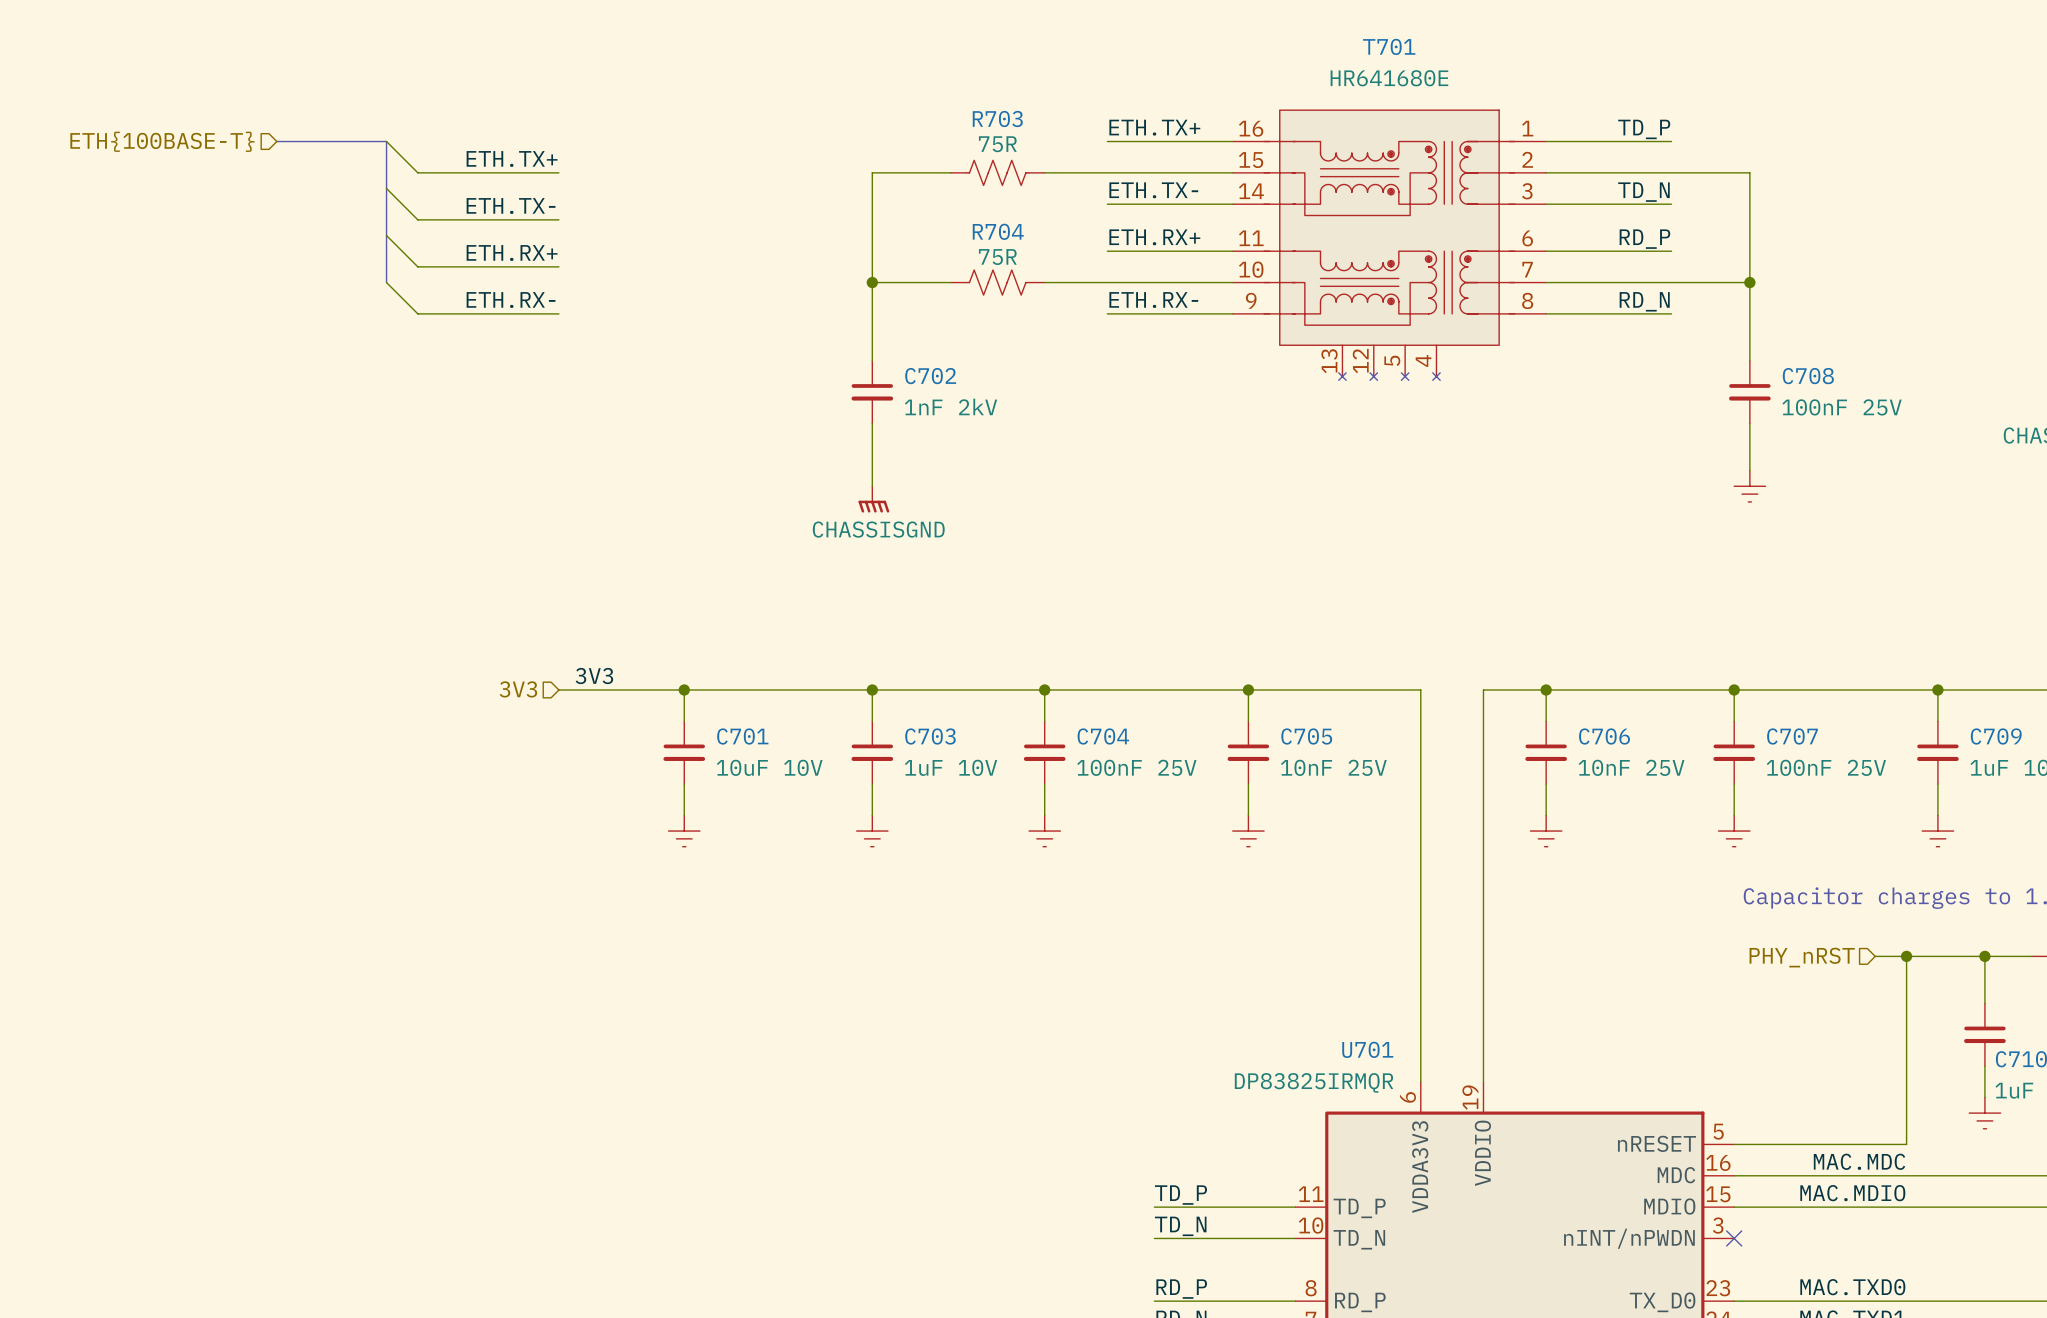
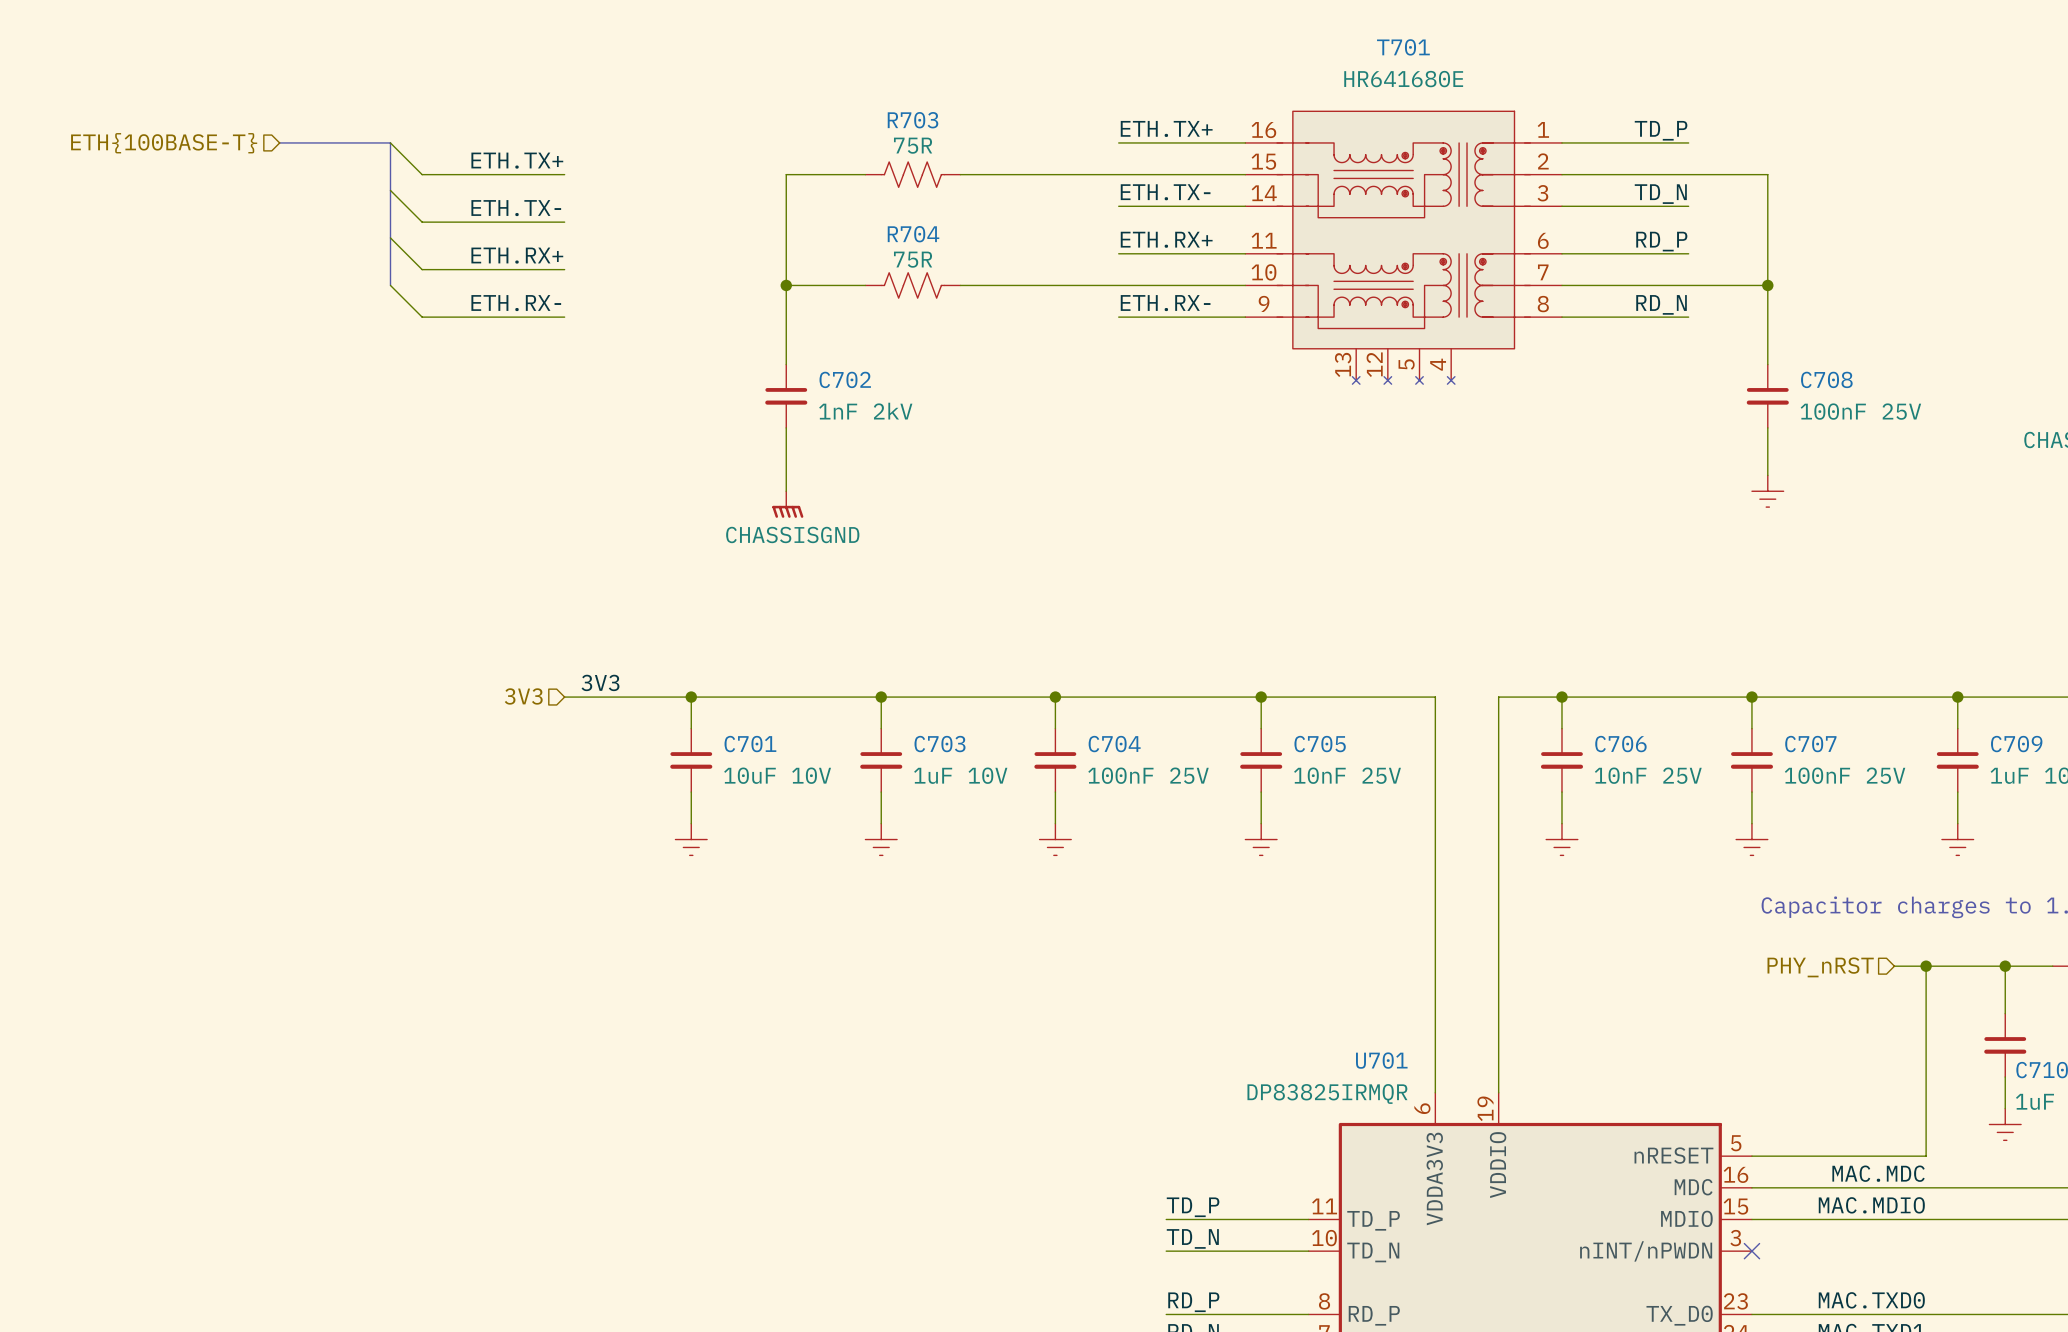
wire: none -> (865, 174) (786, 174) (786, 364)
wire: (950, 172) (872, 172) (872, 360) -> (960, 174) (1055, 174)
R703 position: (997, 172) -> (912, 174)
wire: none -> (786, 285) (865, 285)
junction: none -> (786, 285)
wire: (872, 282) (950, 282) -> (1055, 285) (960, 285)
junction: (872, 282) -> none
R704 position: (997, 282) -> (912, 285)
C702 position: (872, 392) -> (786, 396)
wire: (872, 423) (872, 486) -> (786, 427) (786, 491)
power symbol position: CHASSISGND (873, 499) -> CHASSISGND (787, 504)

